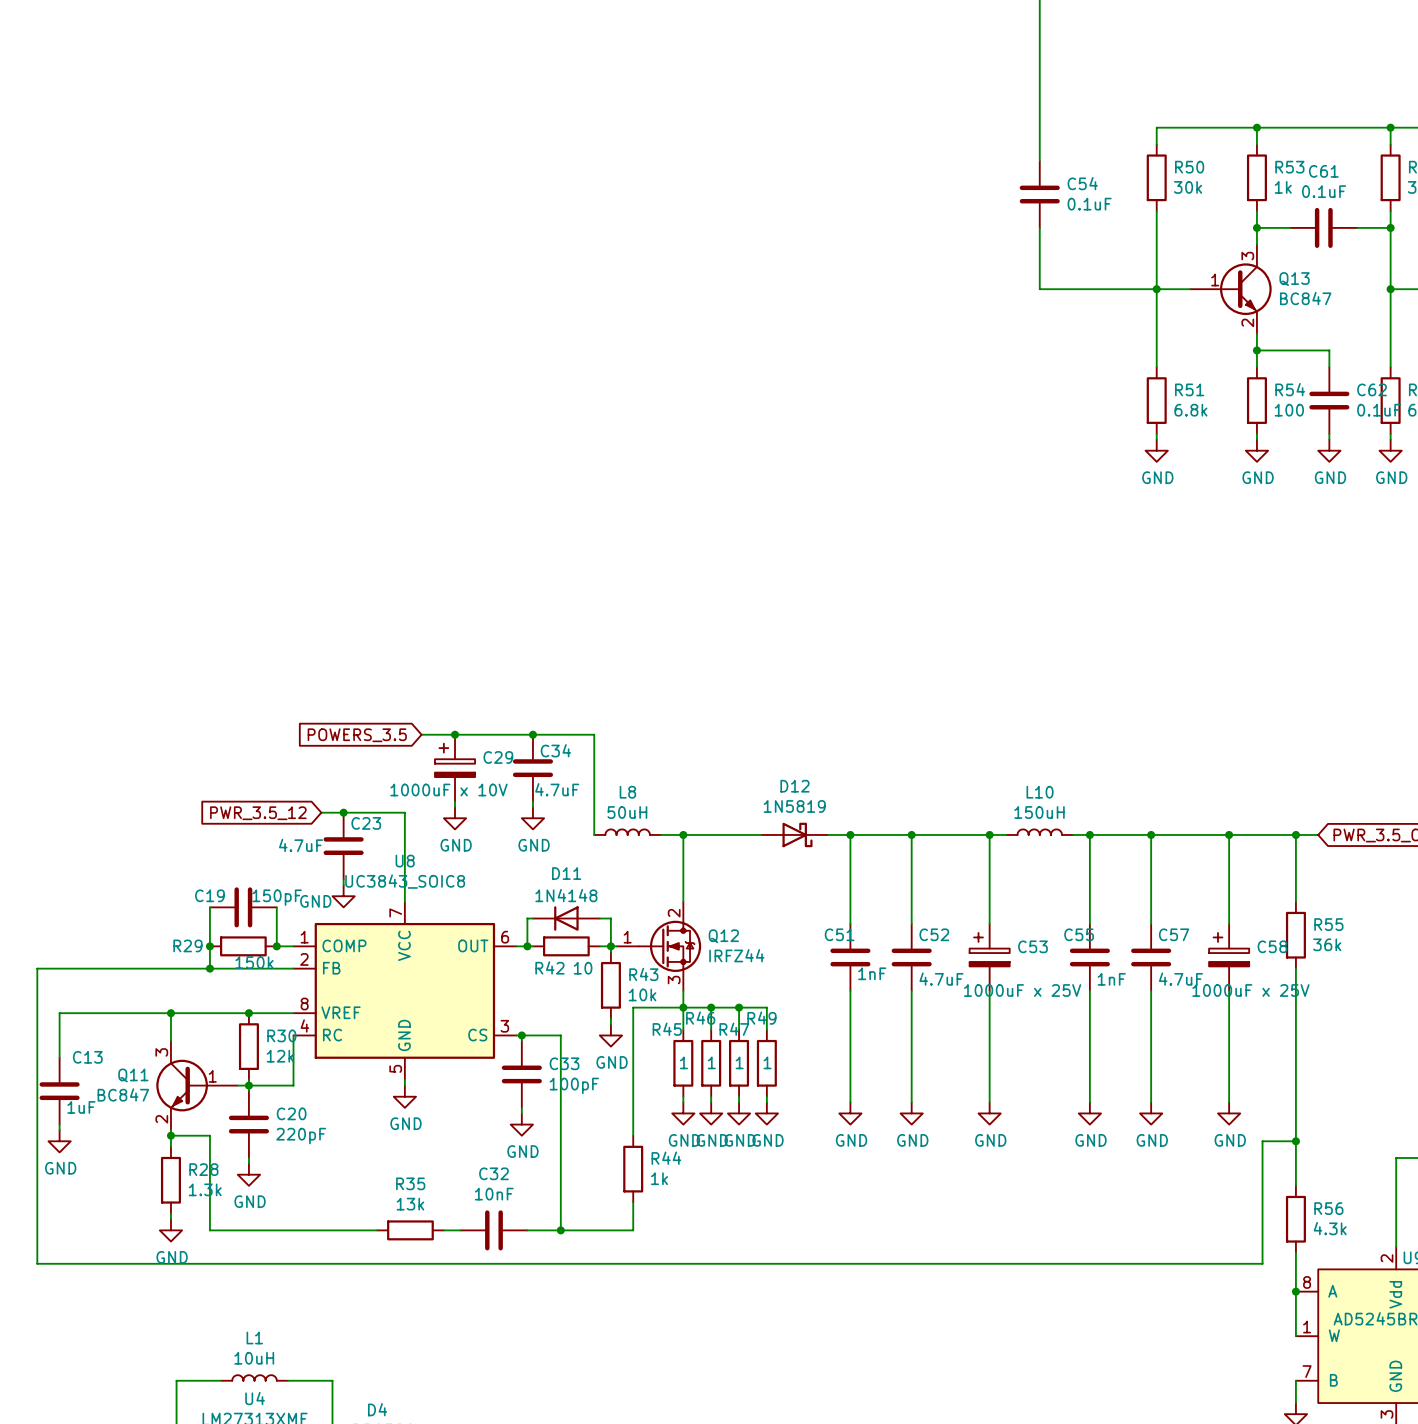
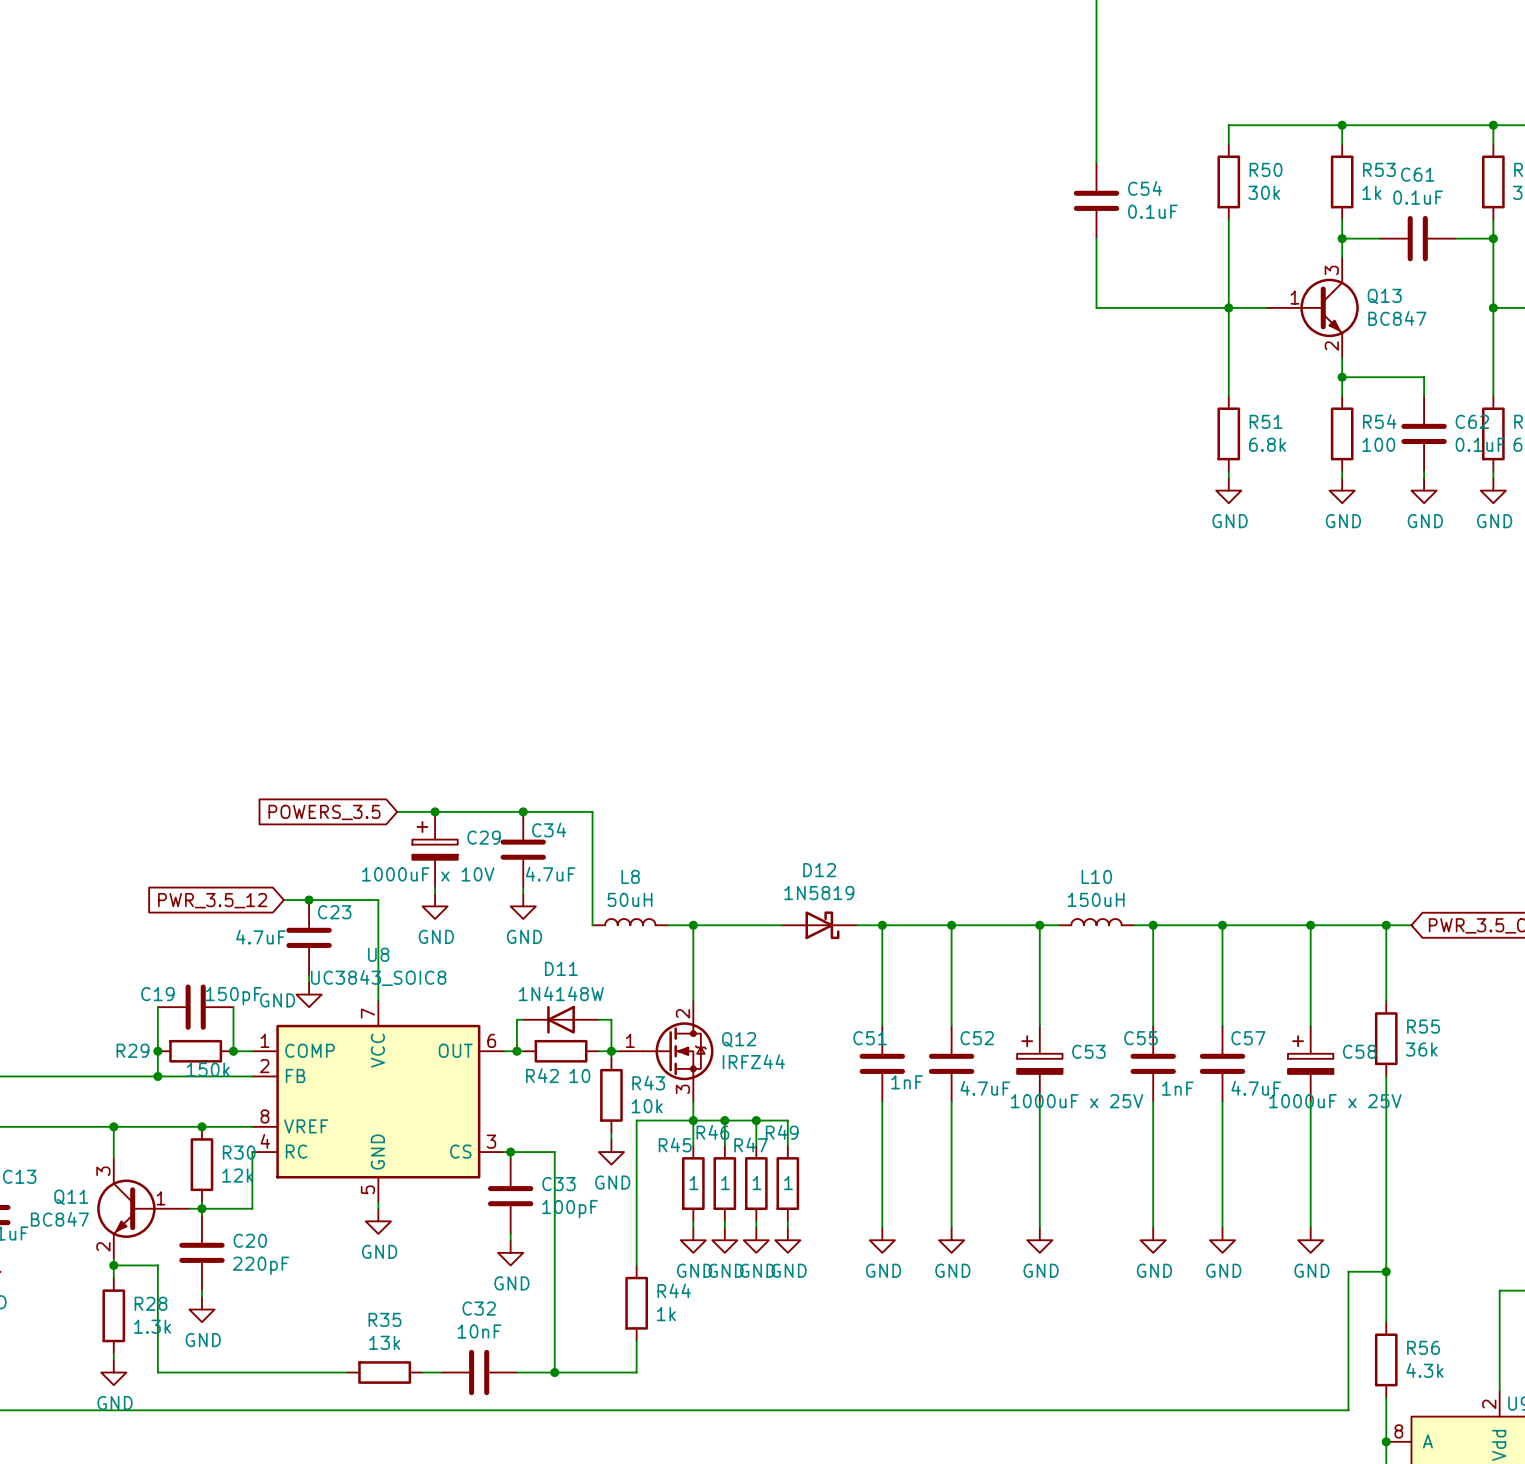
D11 value: 1N4148 (566, 895) -> 1N4148W (561, 993)

